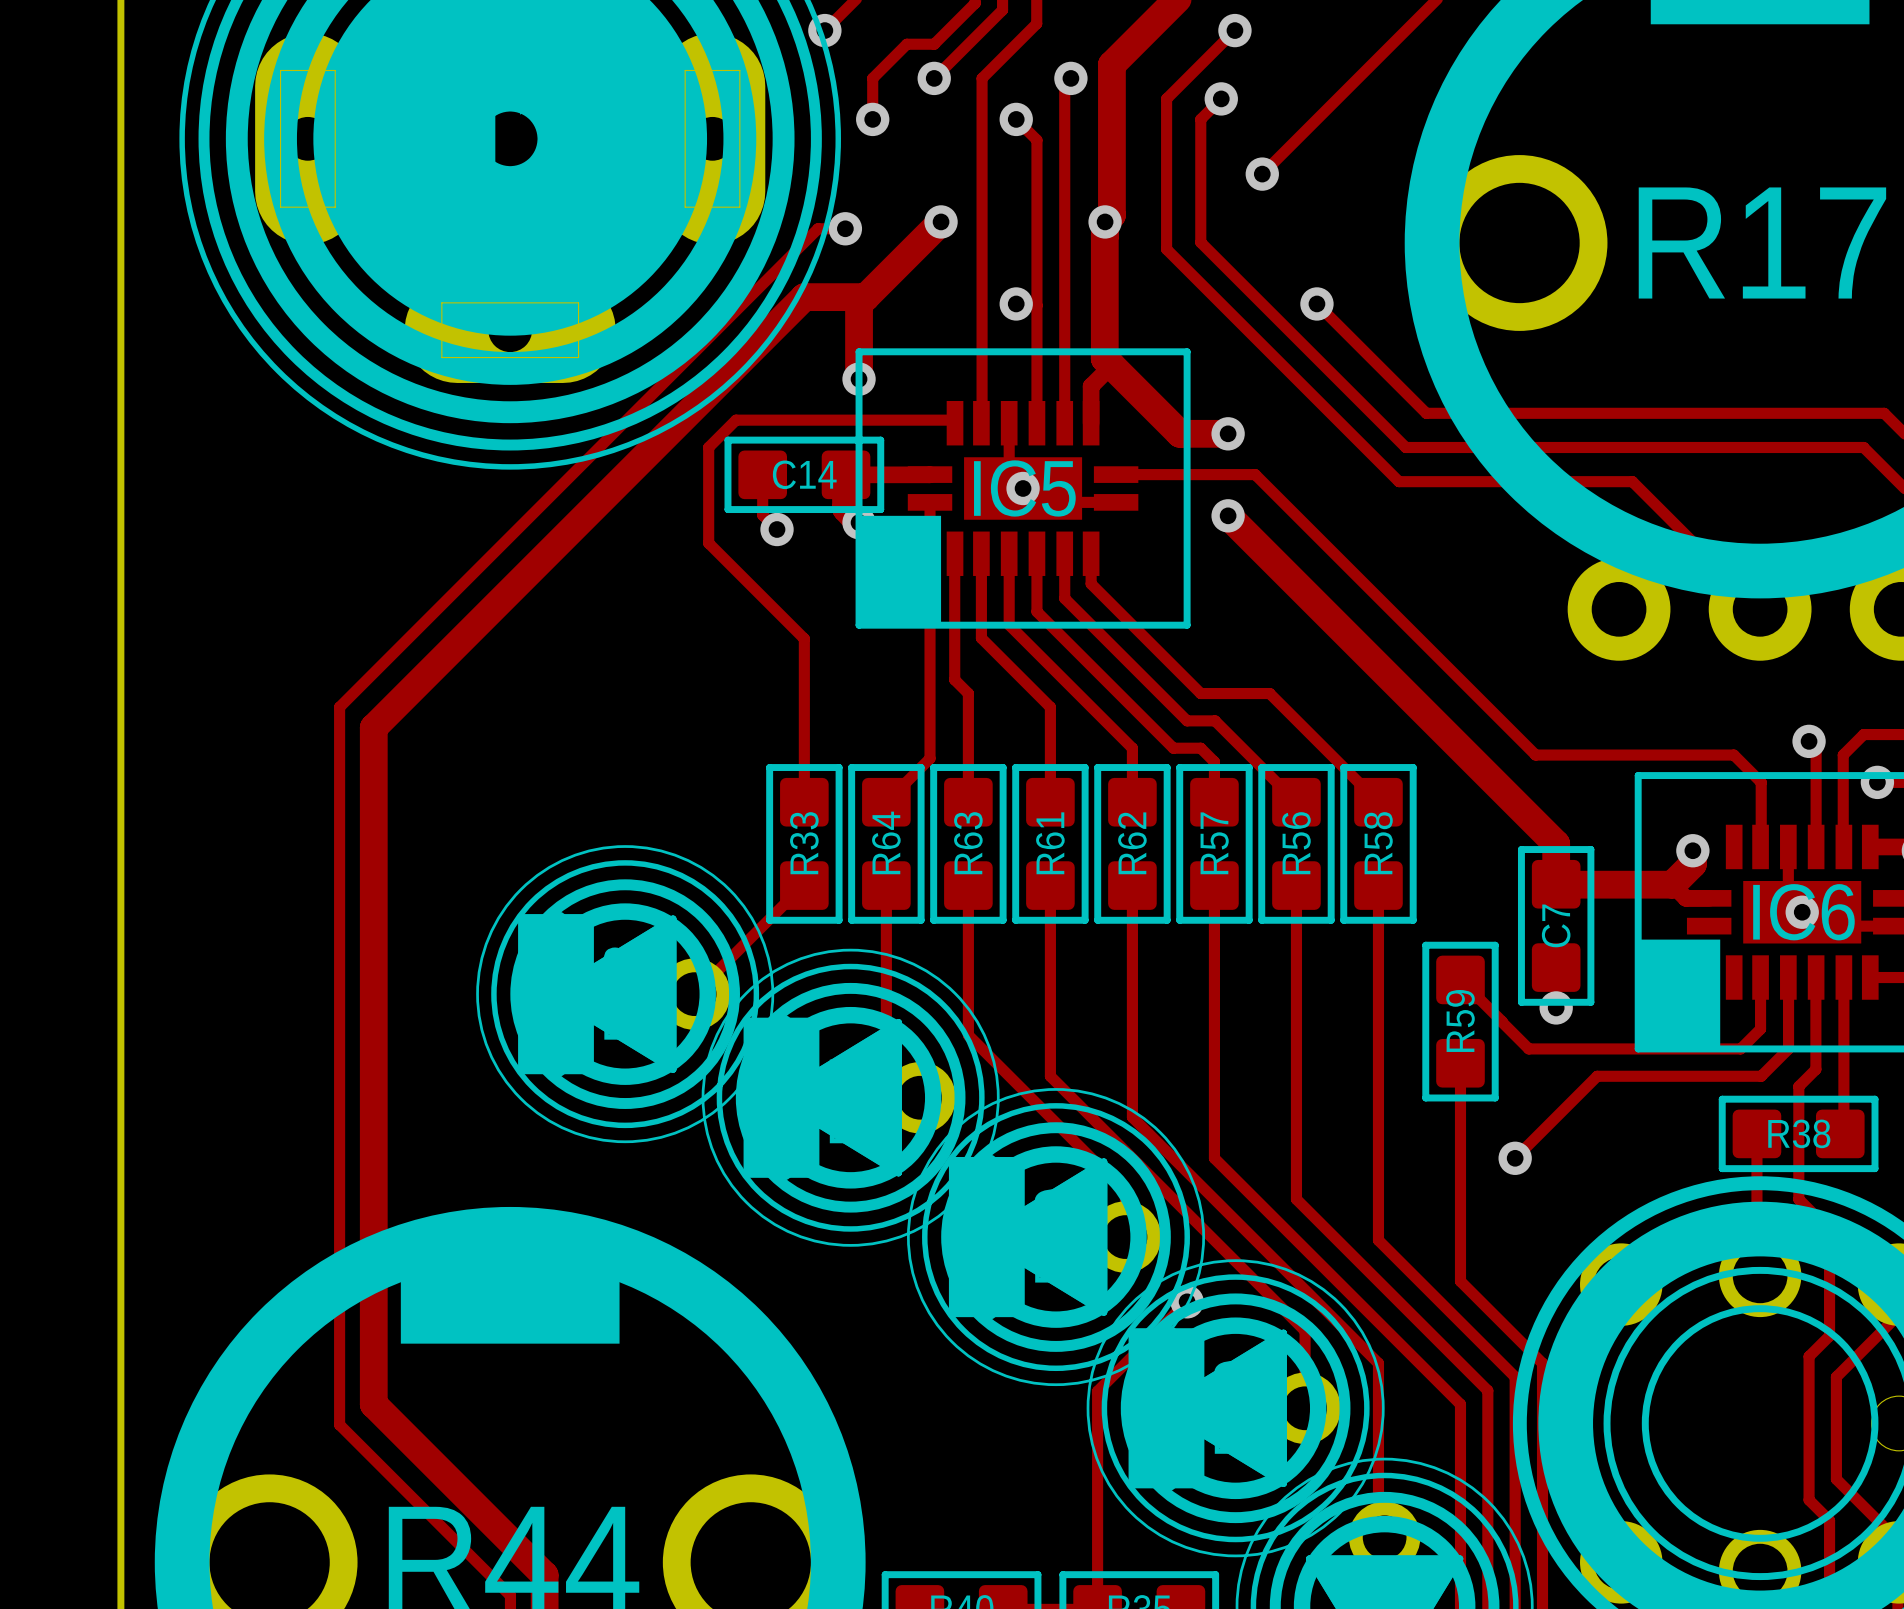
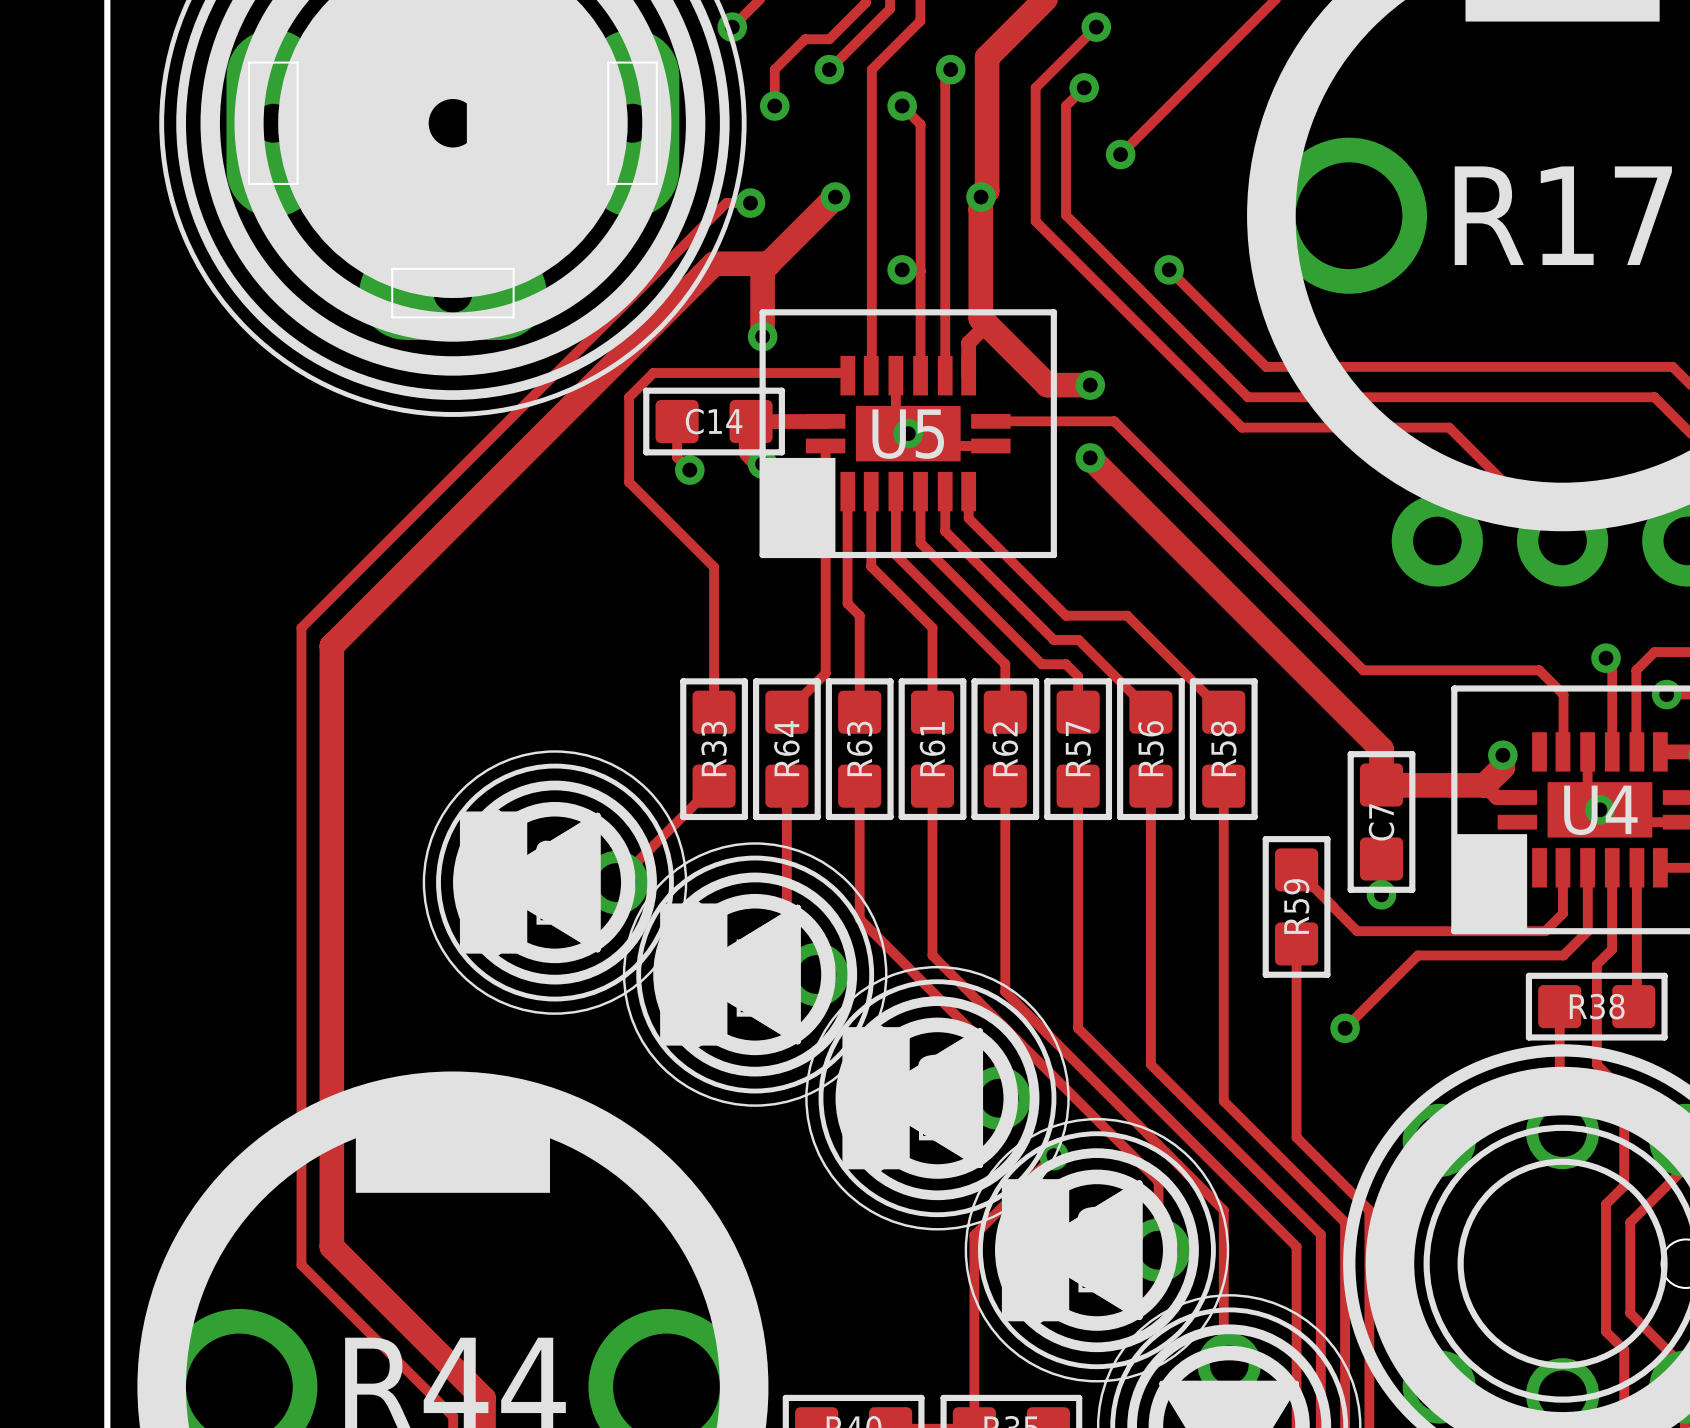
IC5 name: IC5 (1024, 488) -> U5 (908, 434)
IC6 name: IC6 (1803, 912) -> U4 (1600, 810)

